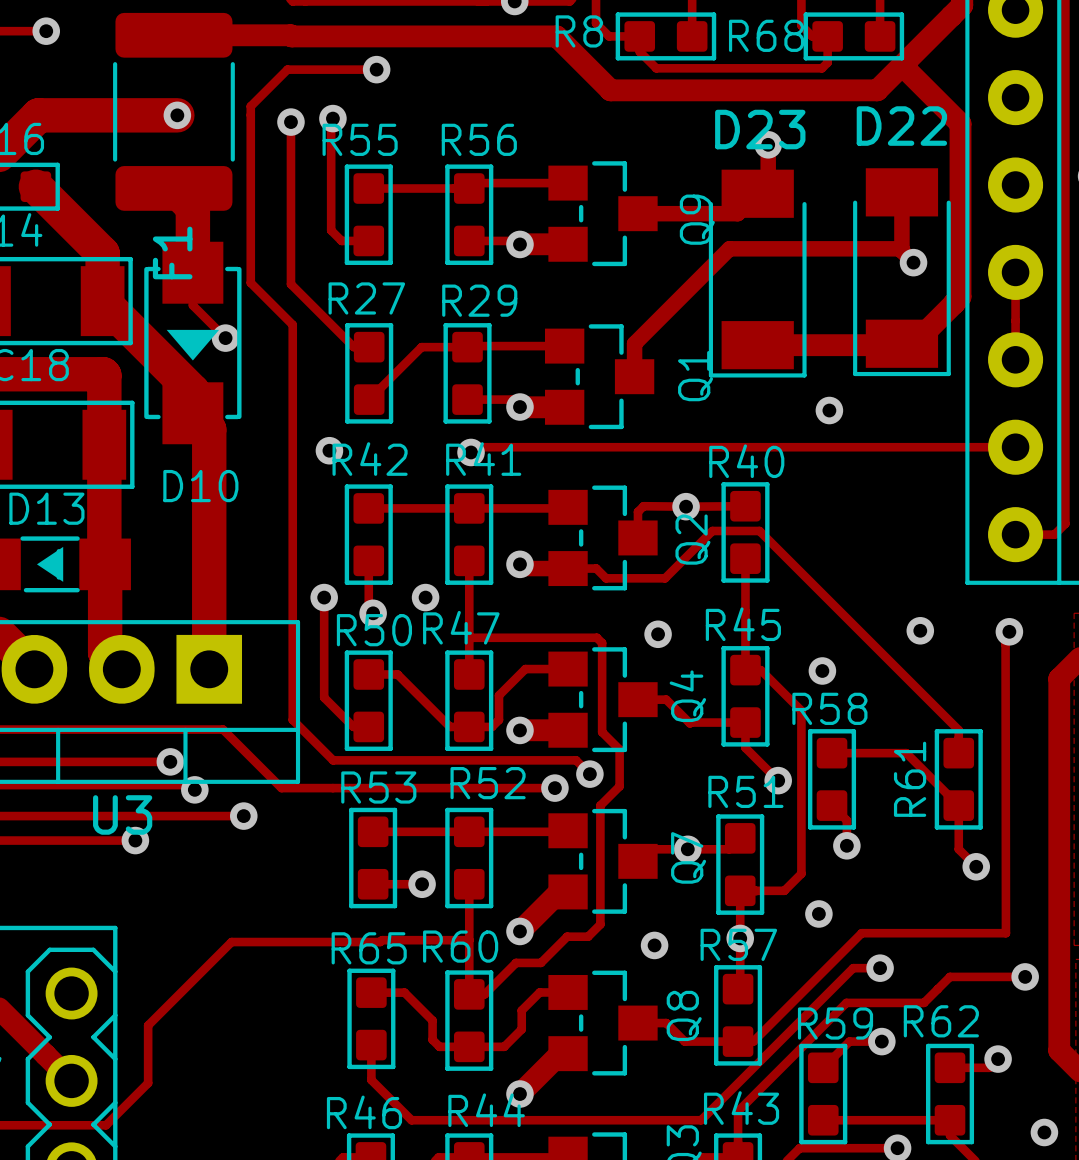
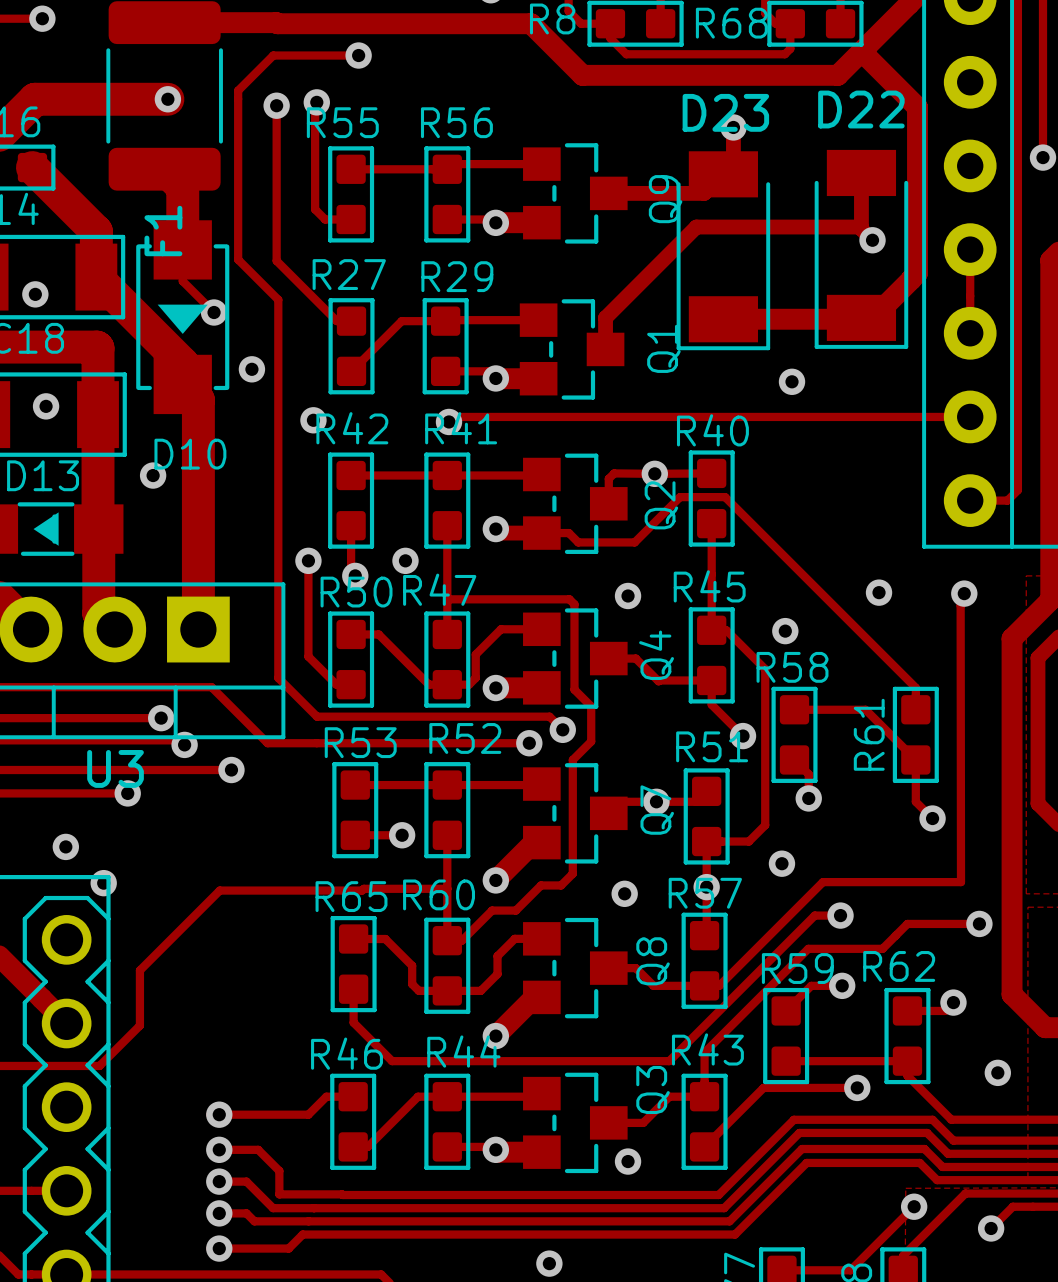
via: none -> (35, 294)
via: none -> (251, 369)
via: none -> (46, 406)
via: none -> (153, 475)
via: none -> (65, 846)
via: none -> (103, 883)

